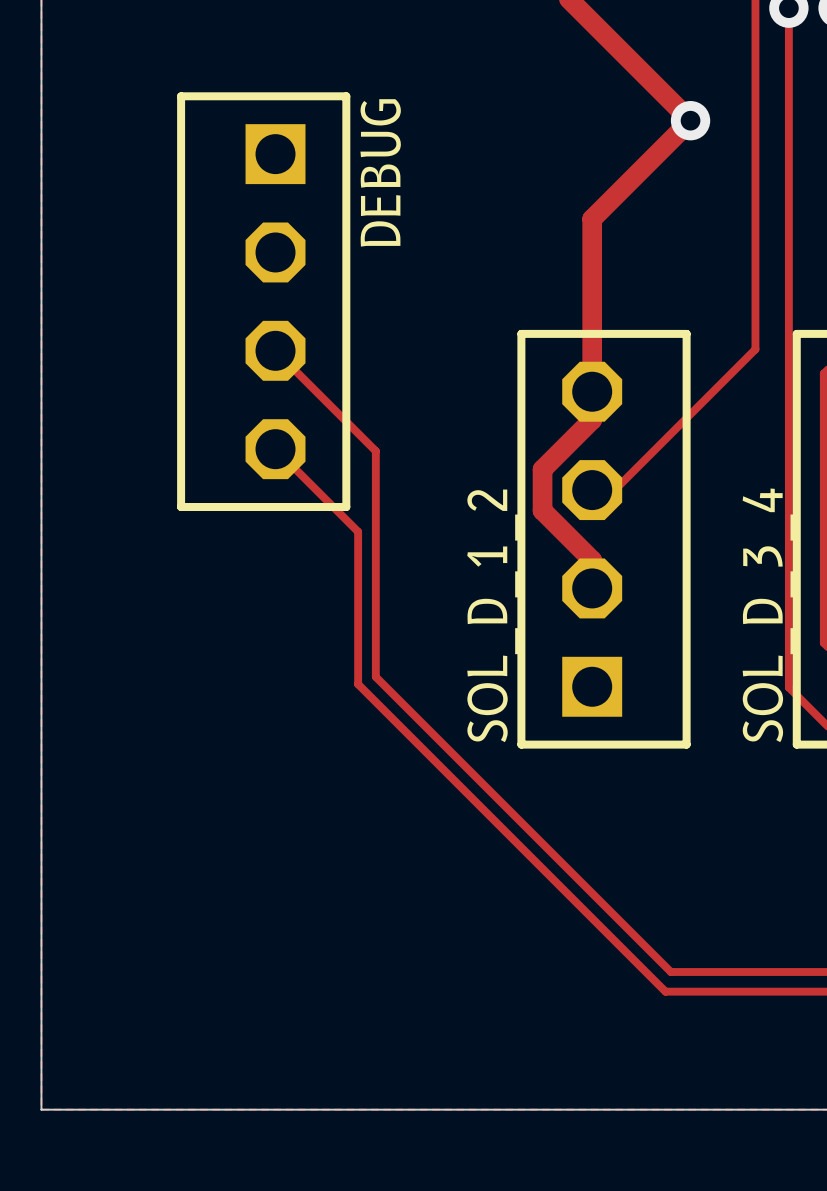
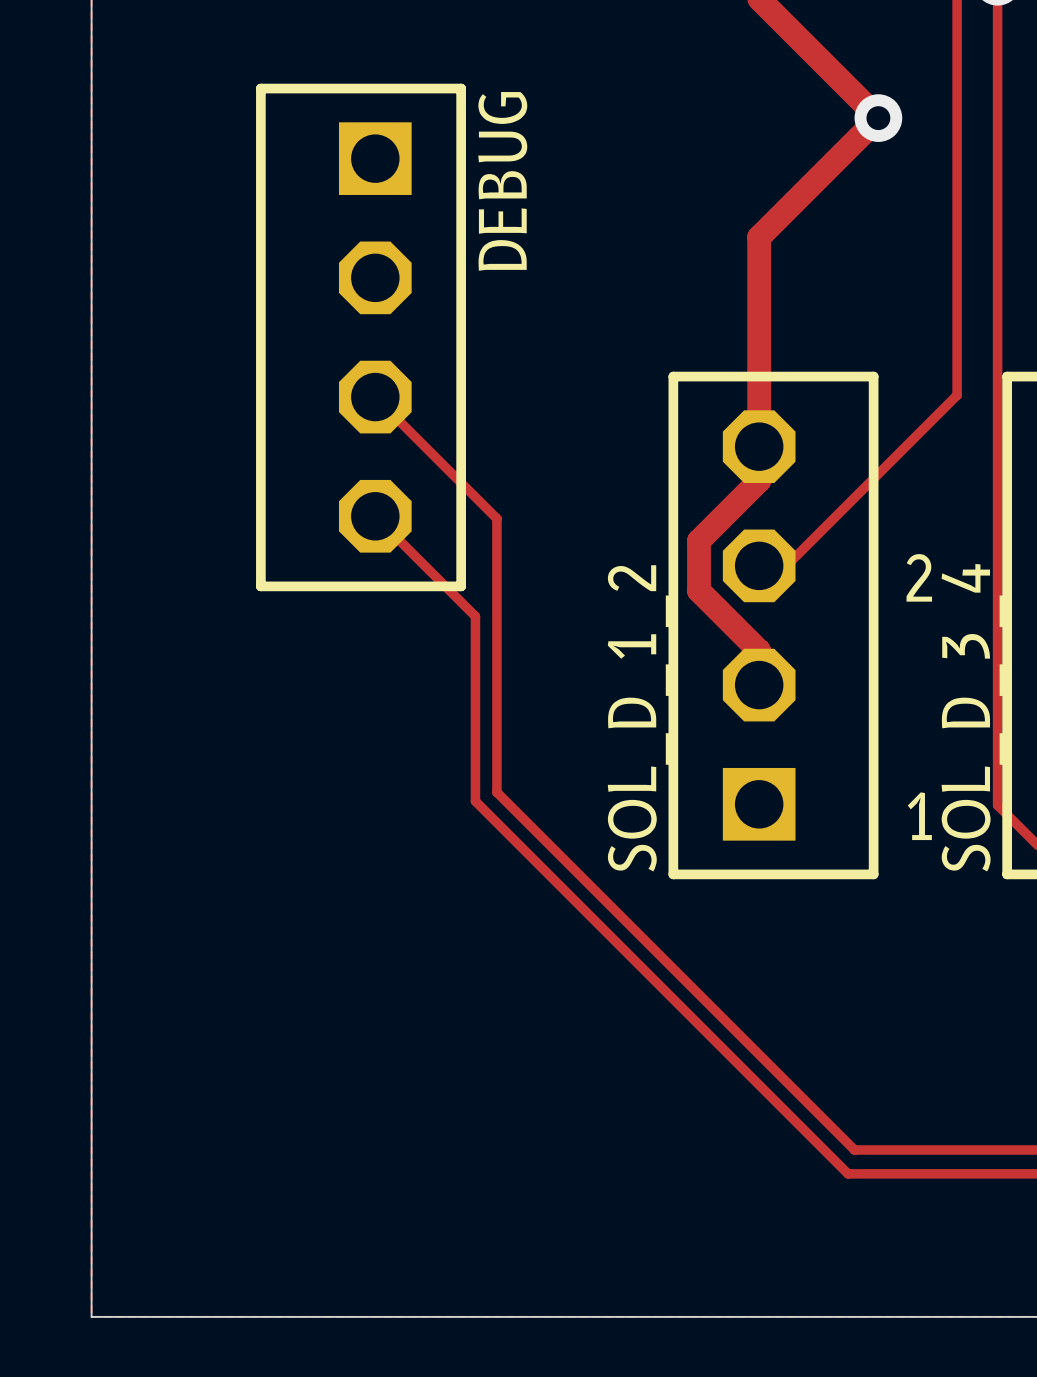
text: none -> 2 (919, 577)
text: none -> 1 (919, 816)

